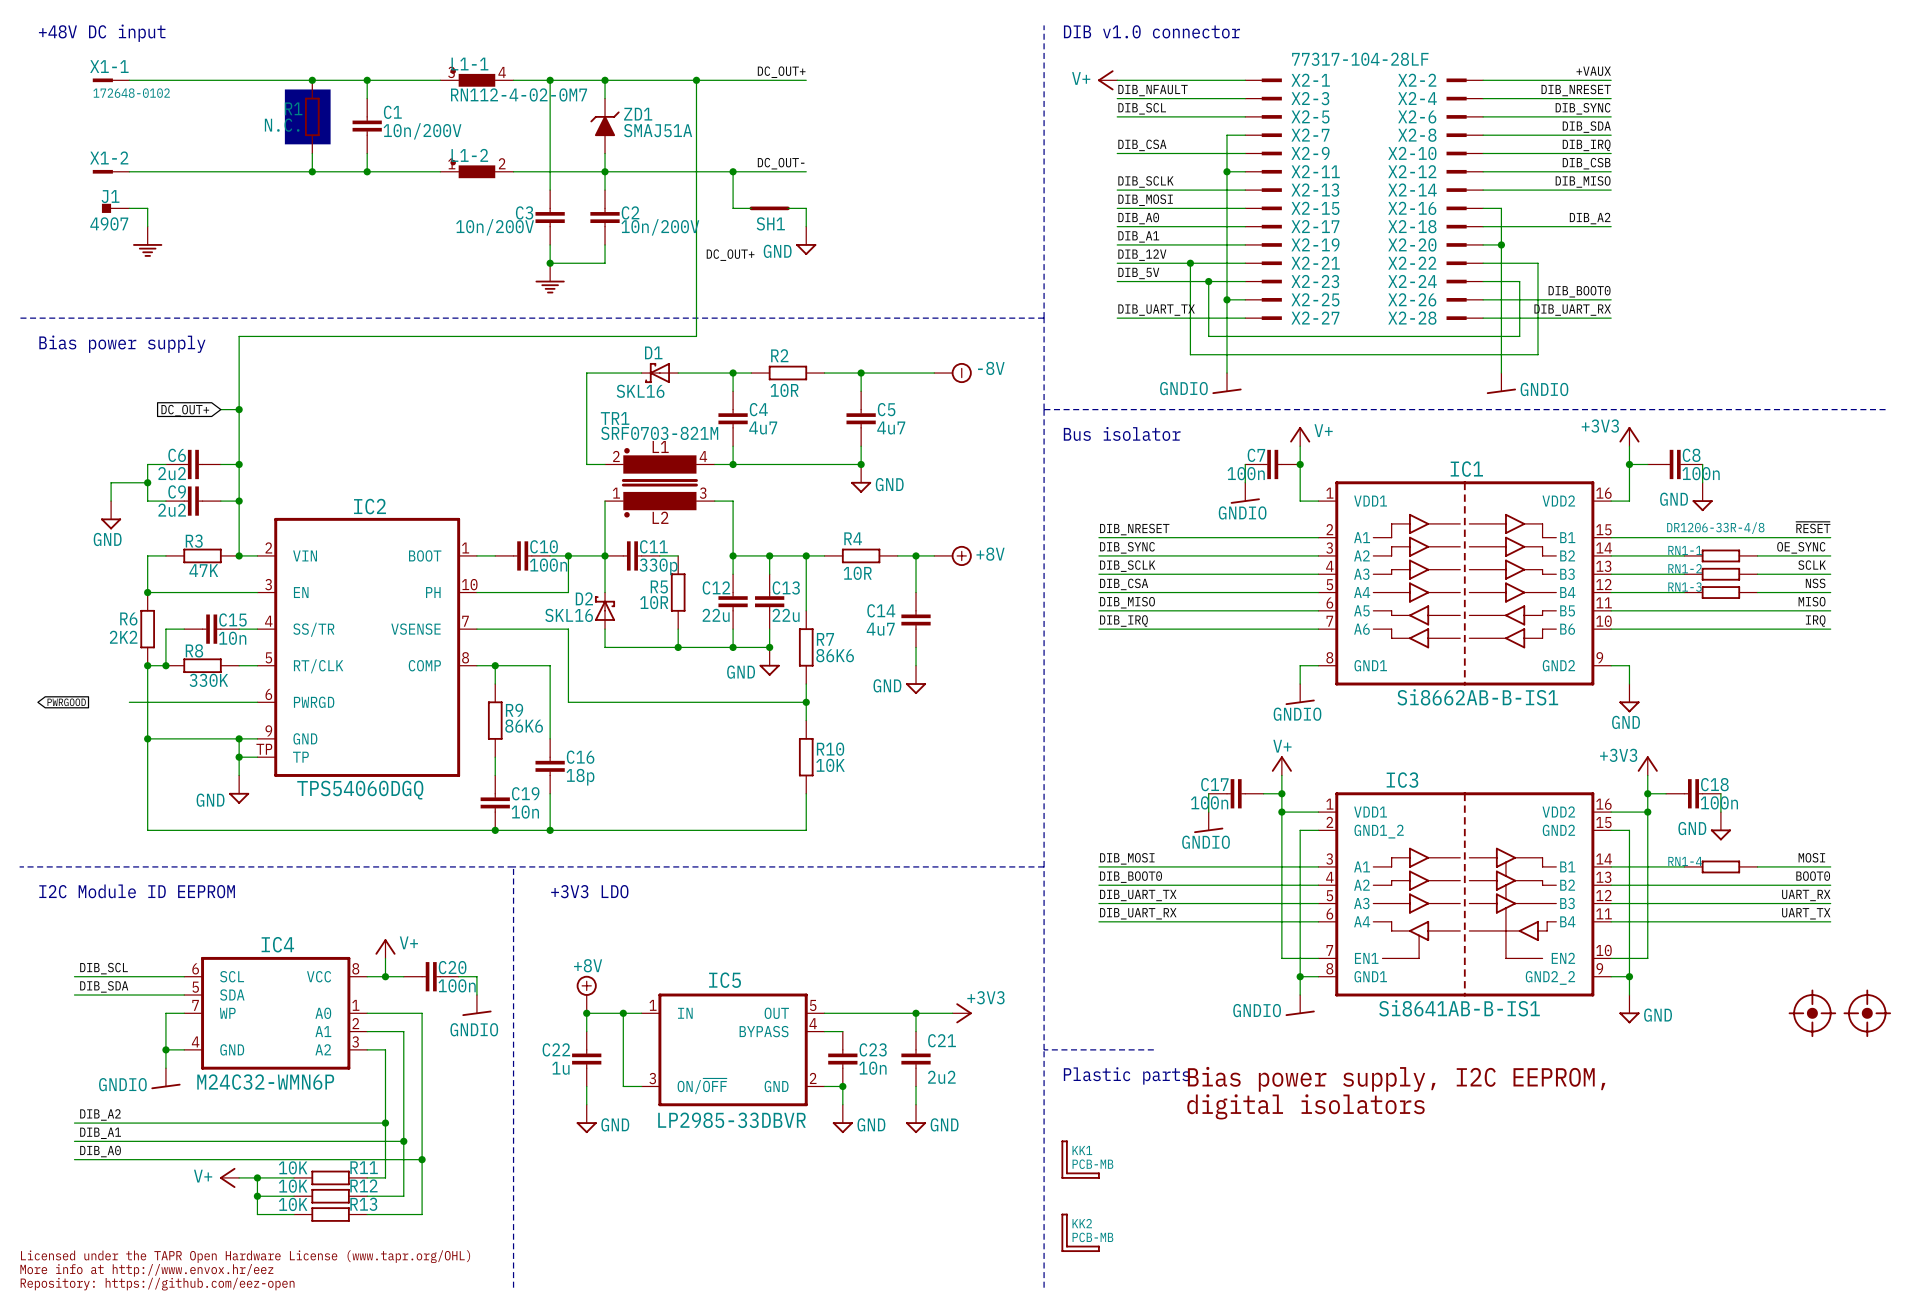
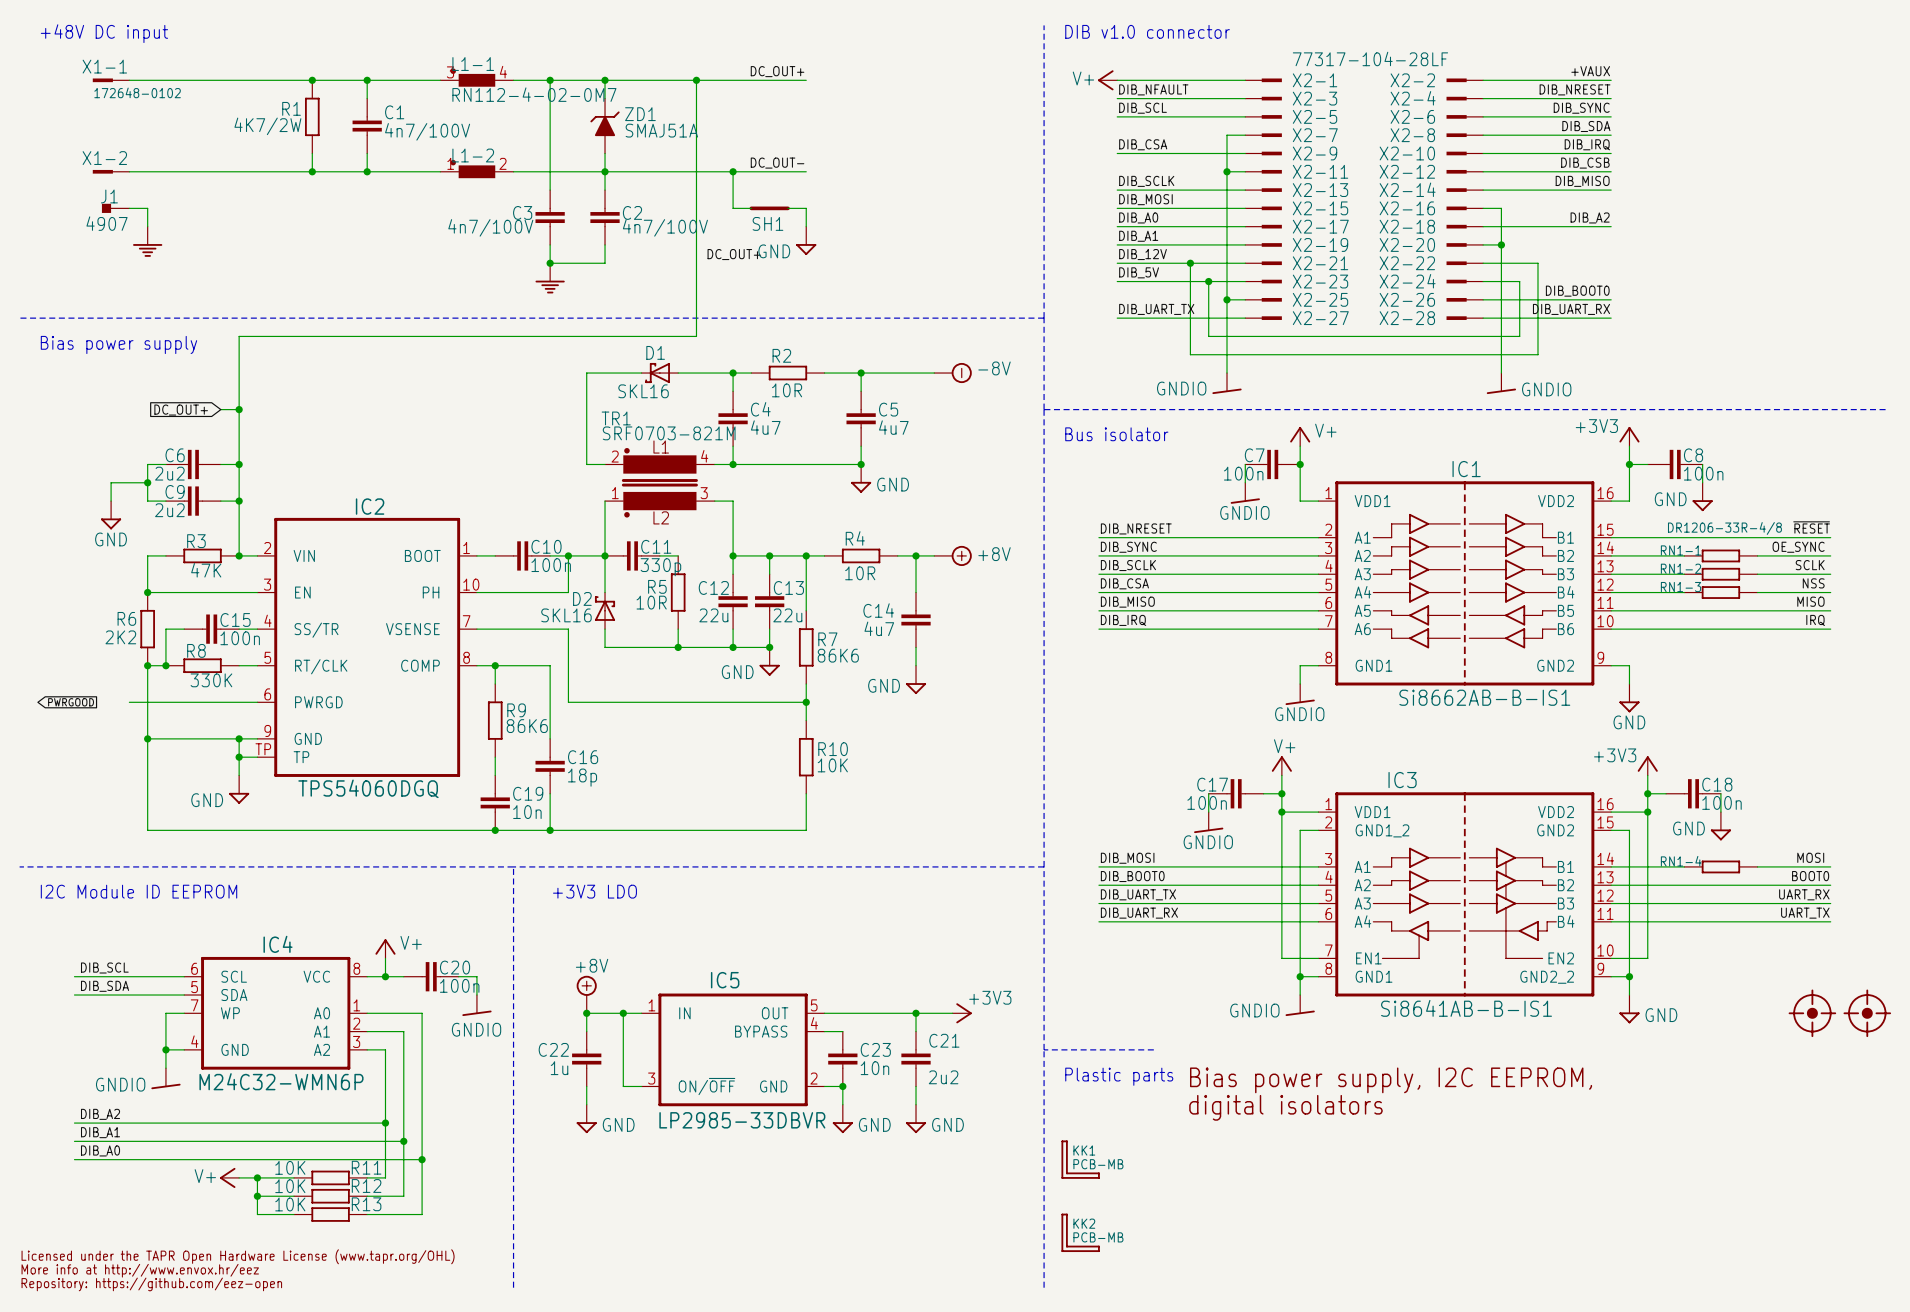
drawing: [284, 89, 331, 145] -> none
R1 value: N.C. (282, 125) -> 4K7/2W (267, 126)
C1 value: 10n/200V (422, 131) -> 4n7/100V (427, 131)
C3 value: 10n/200V (495, 227) -> 4n7/100V (490, 227)
C2 value: 10n/200V (660, 227) -> 4n7/100V (665, 227)
C15 value: 10n (232, 638) -> 100n (240, 638)

